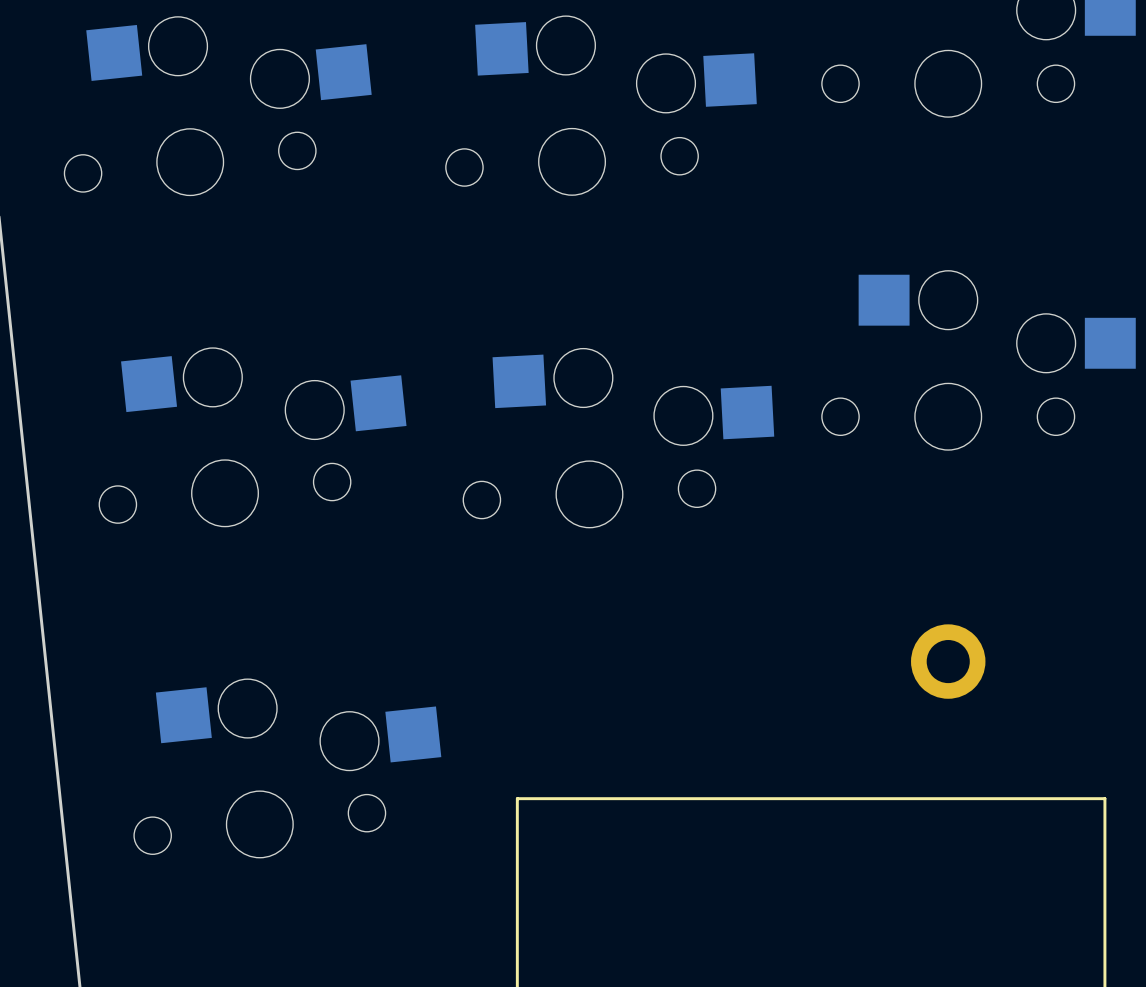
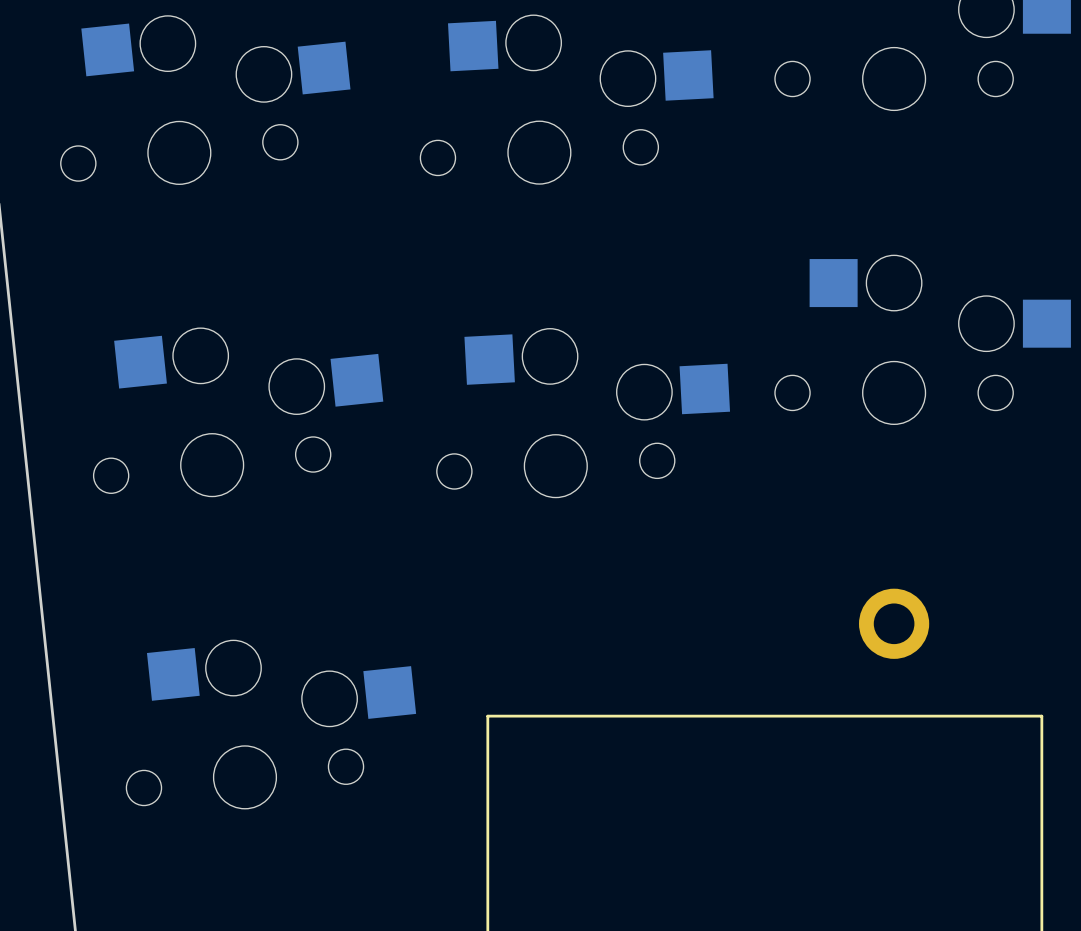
line: (517, 798) (1104, 798) -> (487, 753) (487, 716) (1041, 716) (1041, 753)

